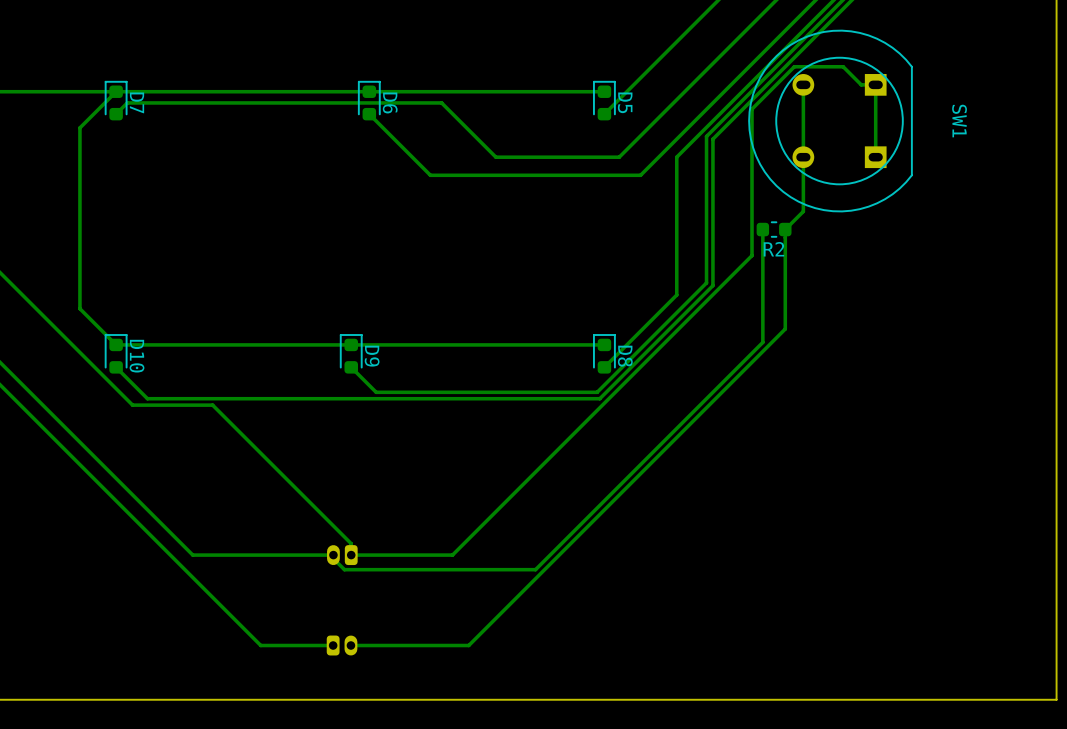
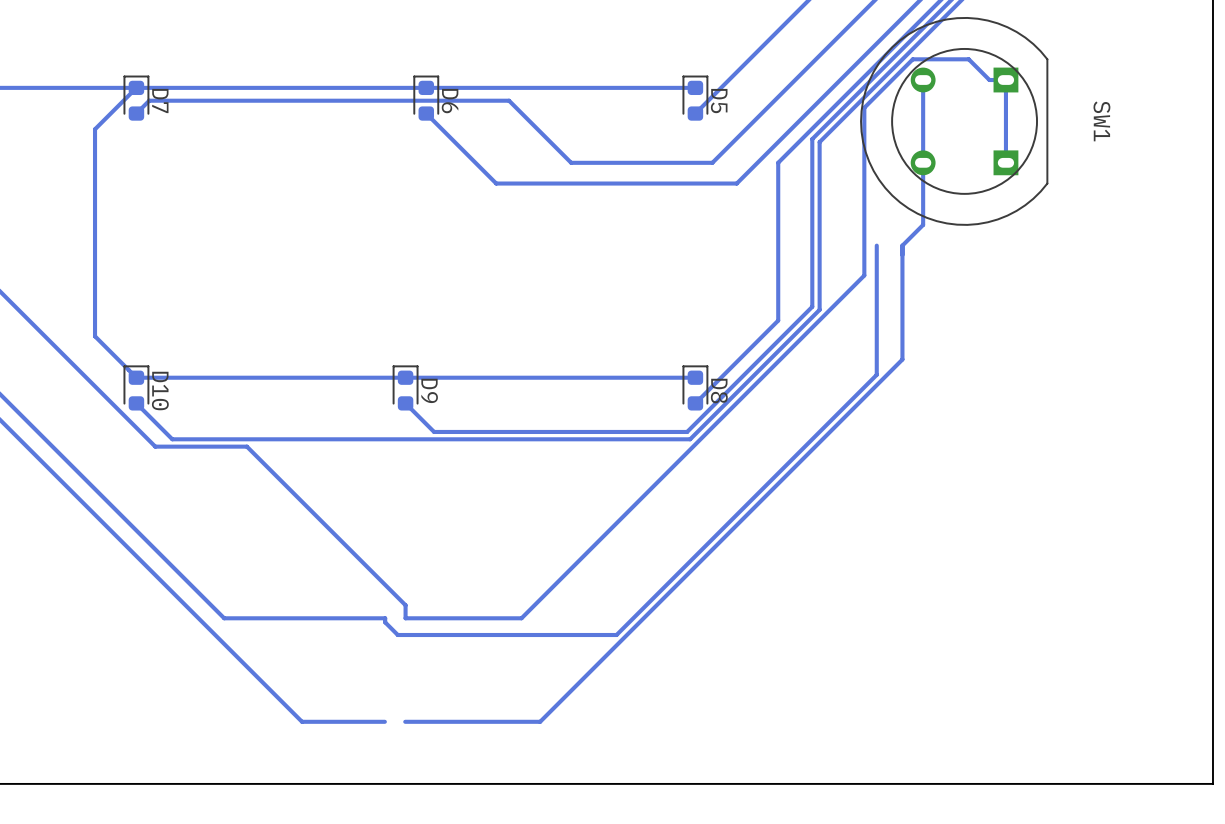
R2: (774, 229) -> none
part: (342, 555) -> none
part: (342, 645) -> none

